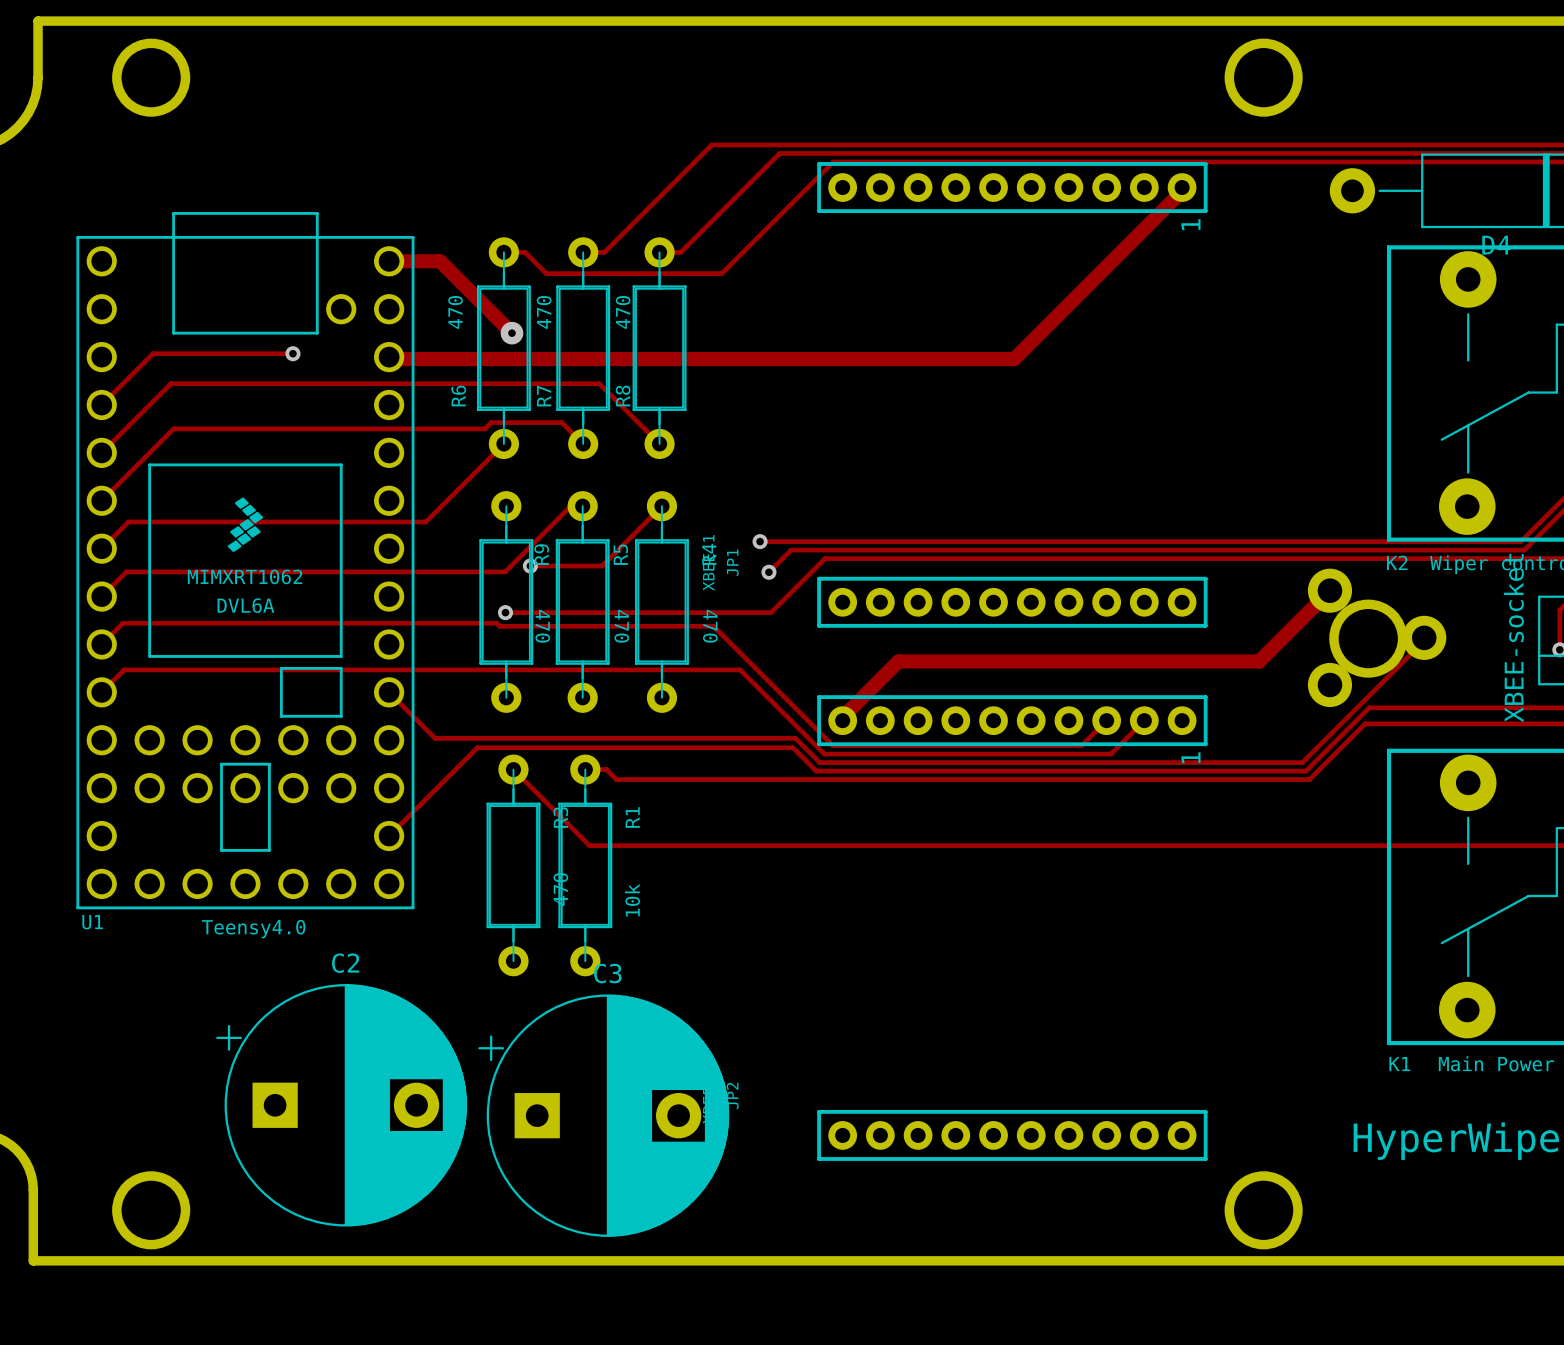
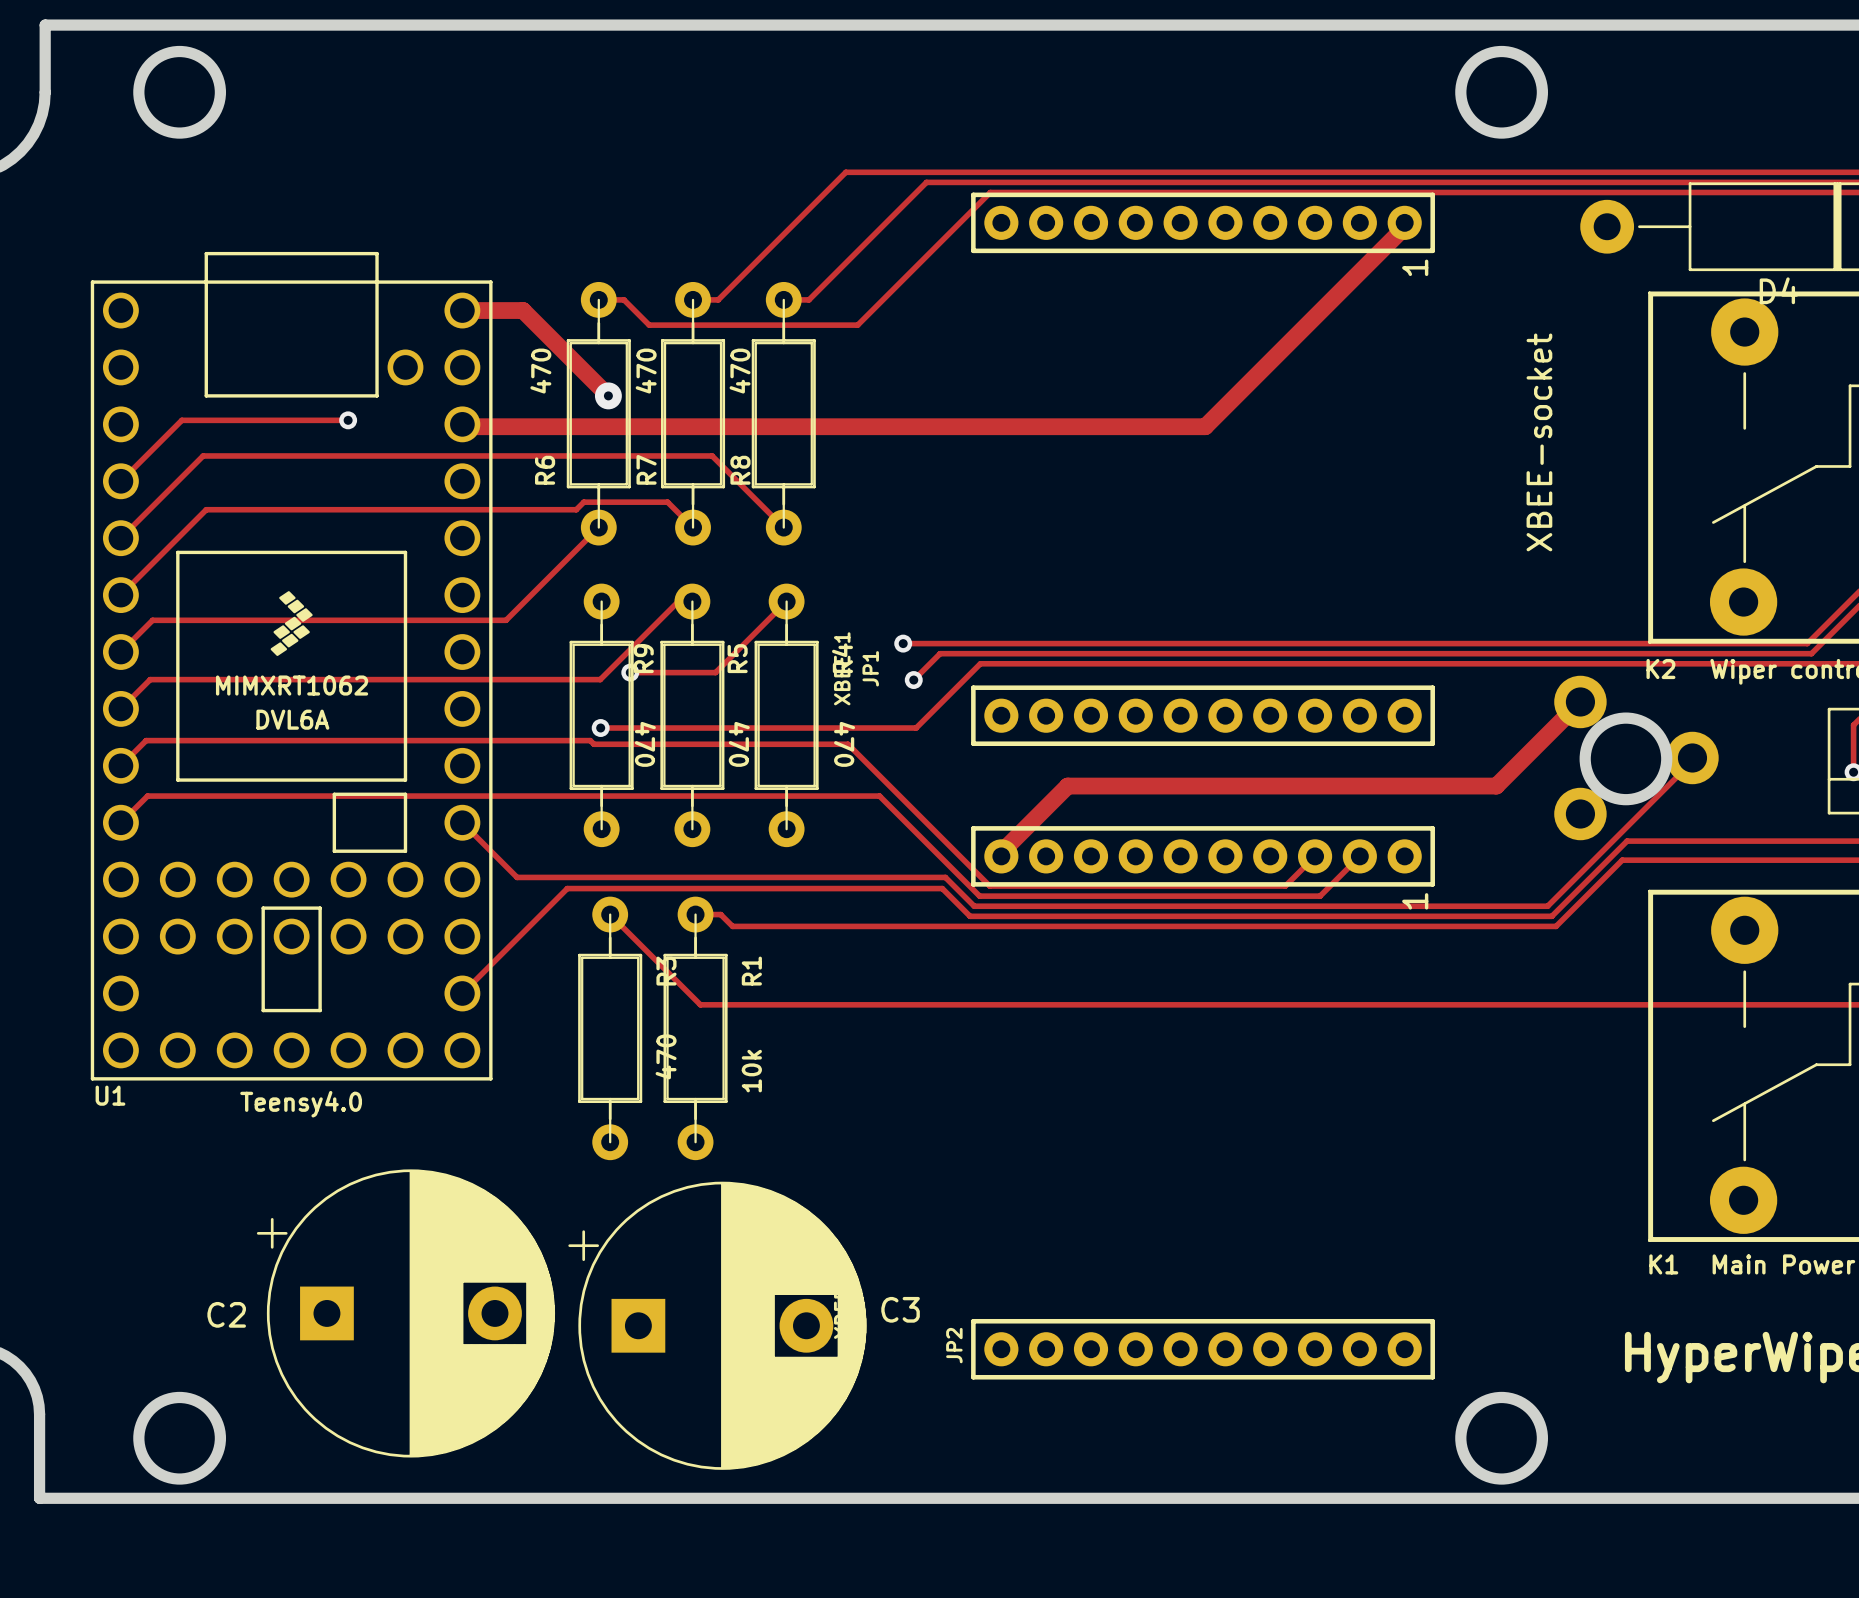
part value position: XBEE-socket (1513, 638) -> XBEE-socket (1539, 442)
C2 name position: C2 (345, 963) -> C2 (226, 1314)
C3 name position: C3 (607, 973) -> C3 (900, 1309)
JP2 name position: JP2 (732, 1095) -> JP2 (954, 1345)

